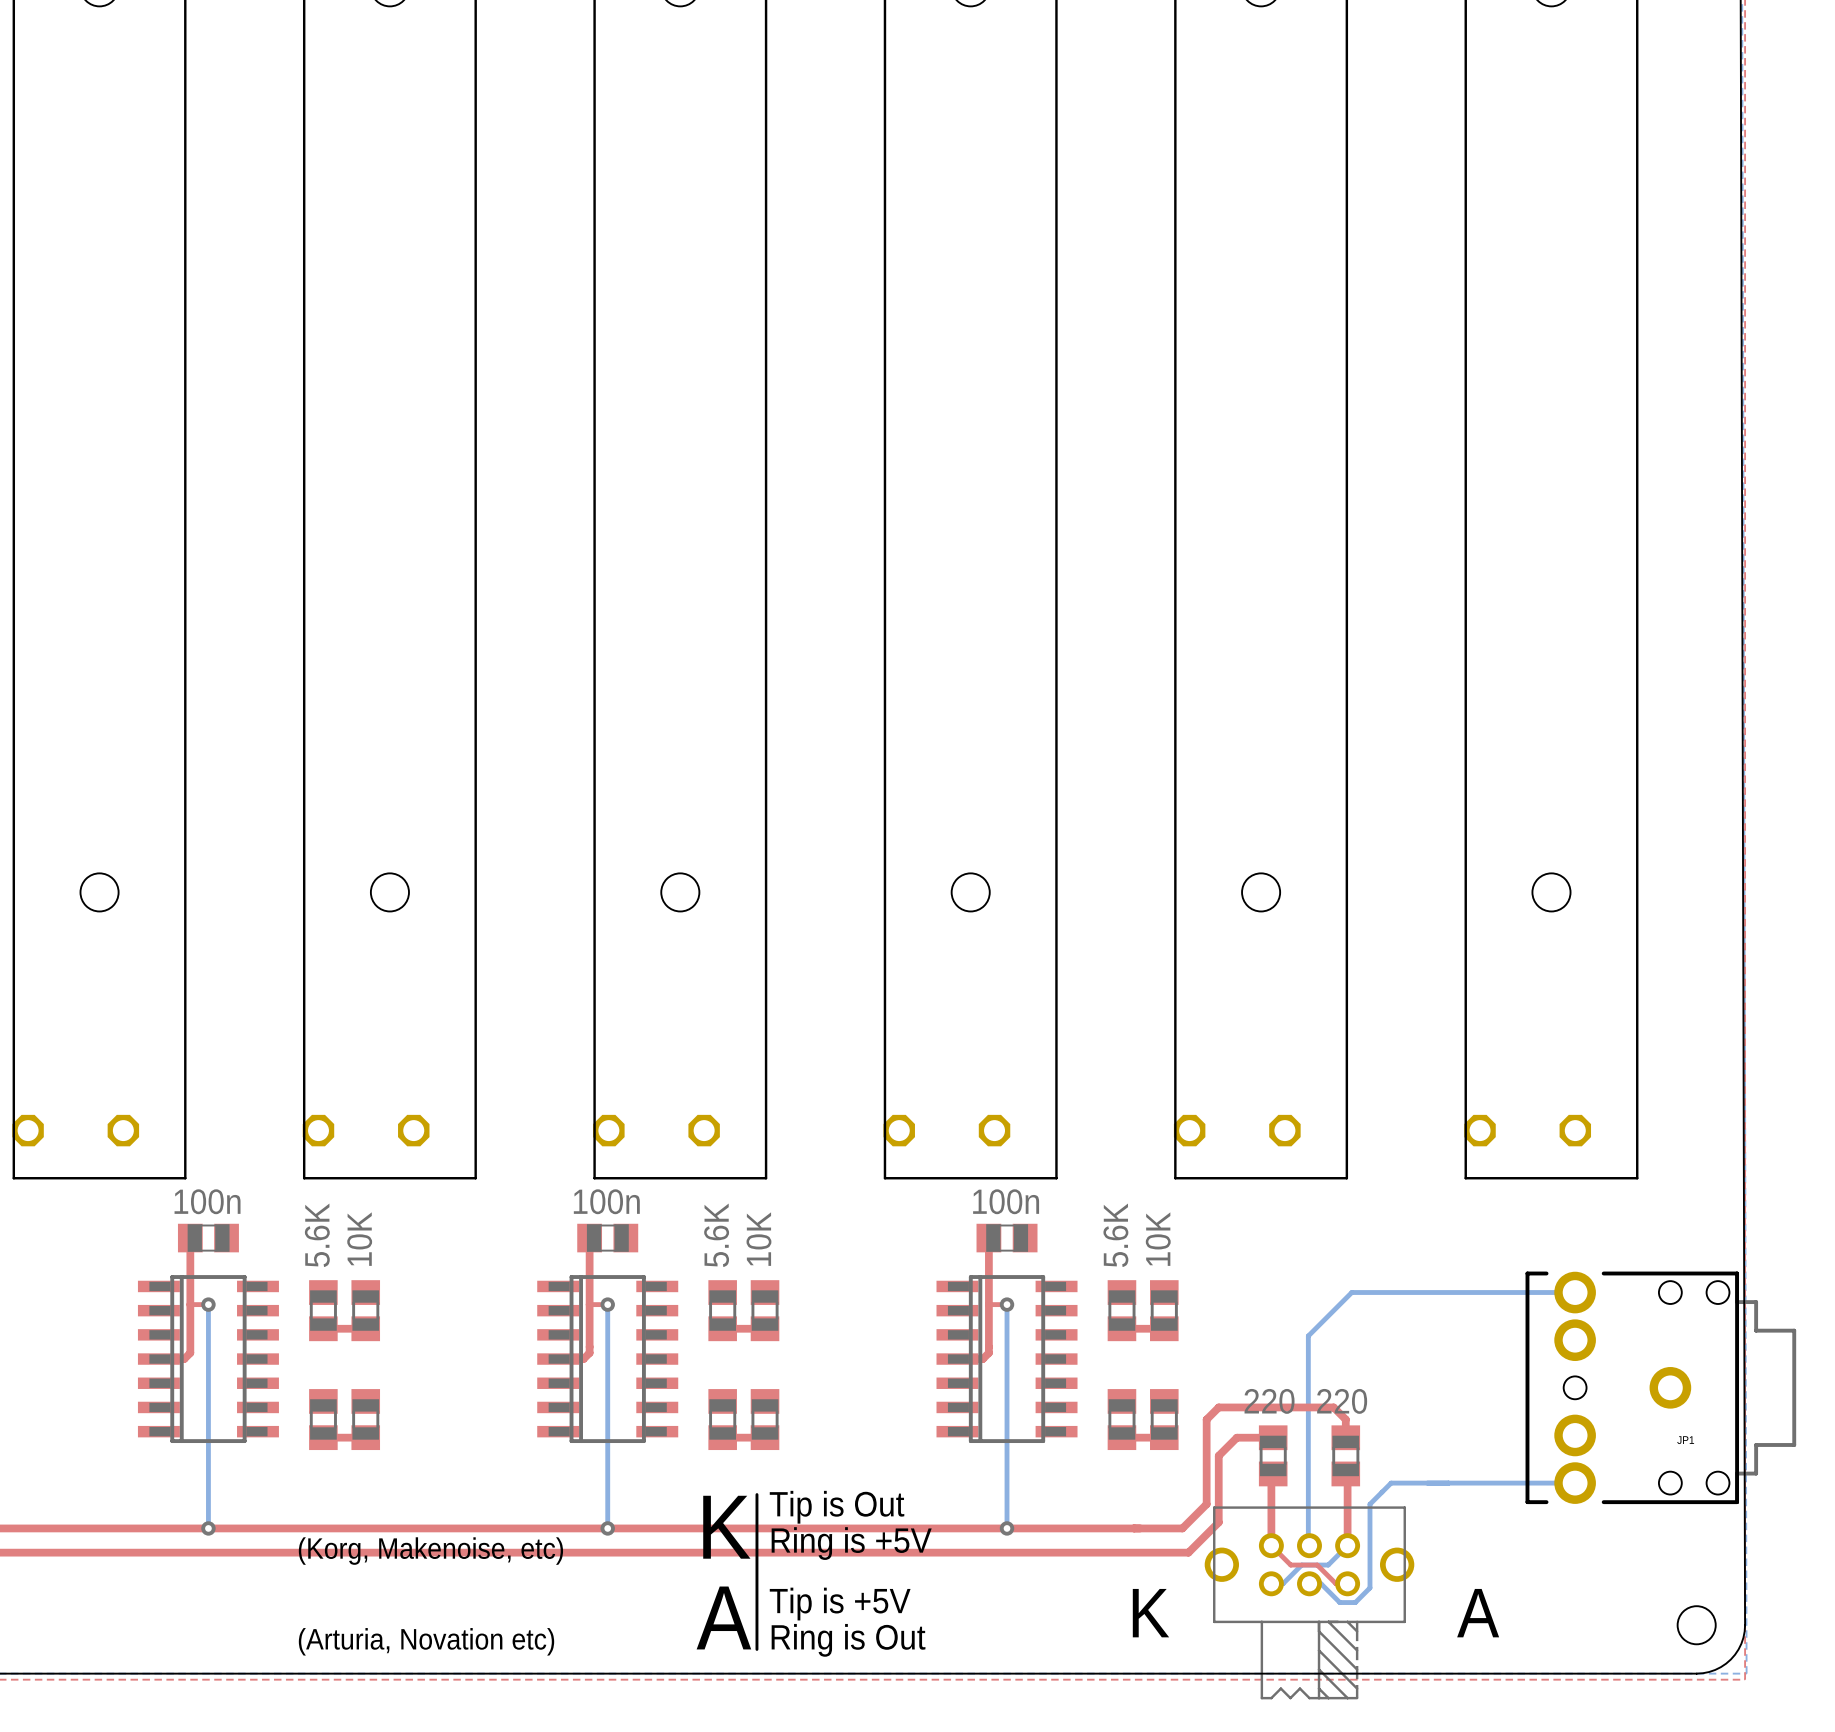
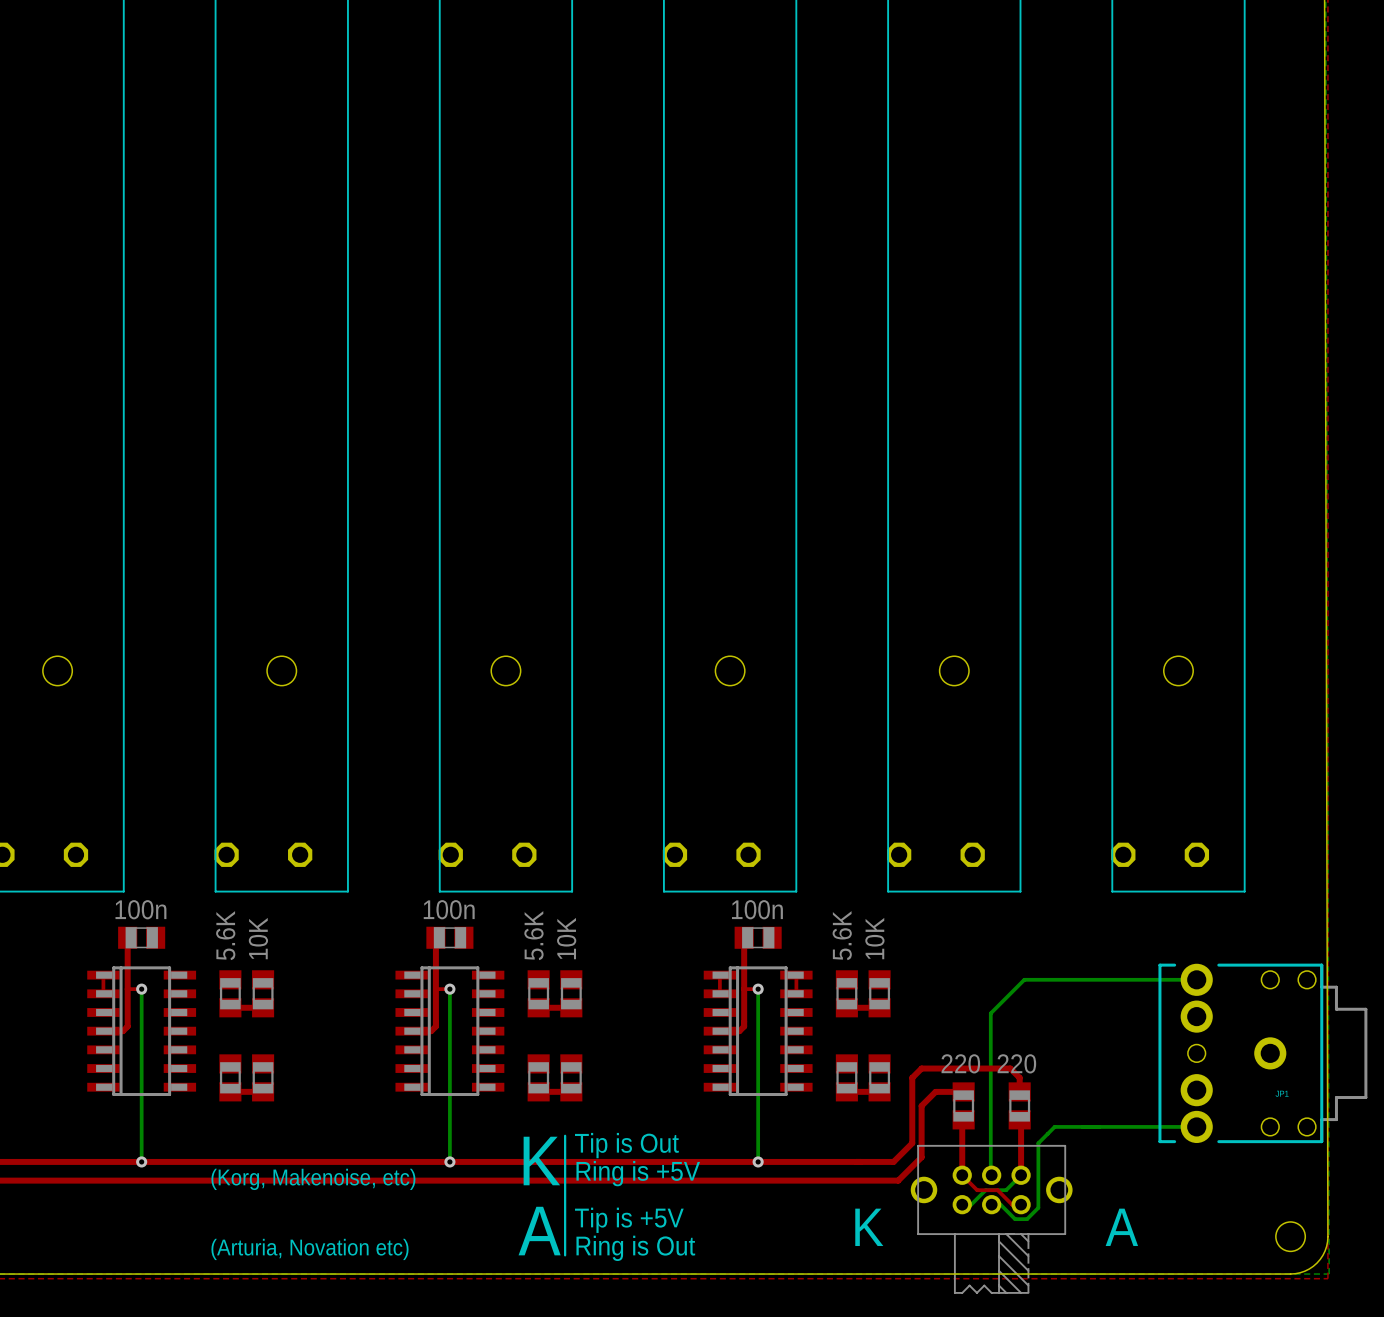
top track: none -> (103, 975) (103, 993)
top track: none -> (719, 975) (719, 993)
top track: none -> (796, 975) (796, 993)

